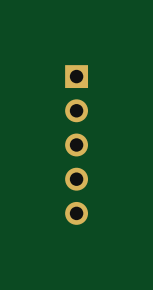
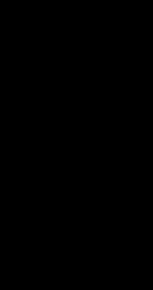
part: (76, 144) -> none

